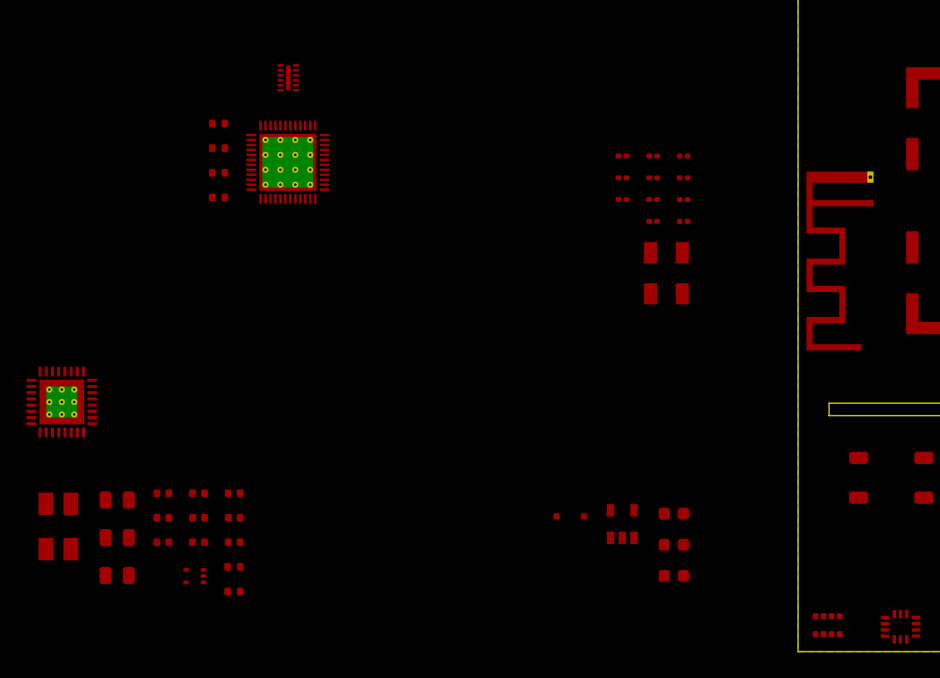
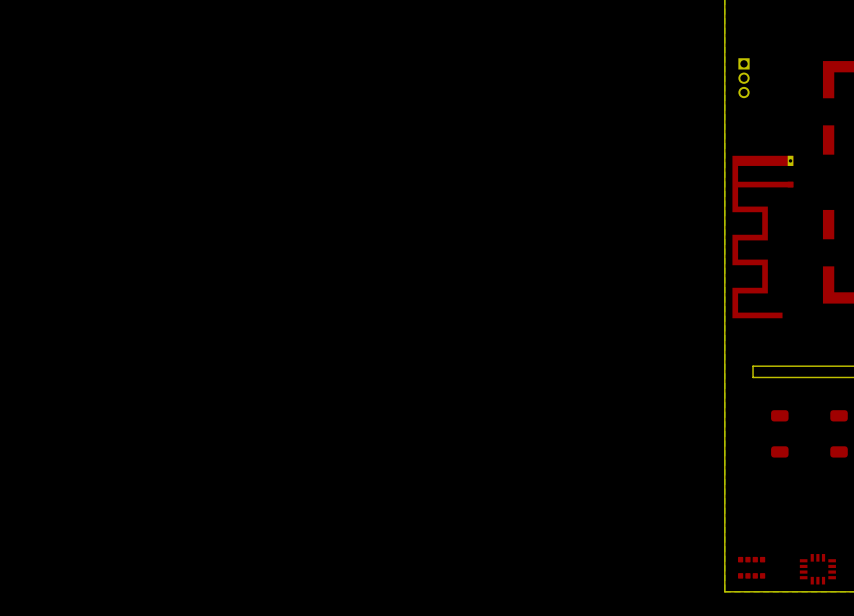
part: (288, 77) -> none
part: none -> (744, 78)
part: (218, 123) -> none
part: (218, 148) -> none
part: (622, 156) -> none
part: (653, 156) -> none
part: (683, 156) -> none
part: (287, 162) -> none
part: (218, 172) -> none
part: (622, 177) -> none
part: (653, 177) -> none
part: (683, 177) -> none
part: (218, 197) -> none
part: (622, 199) -> none
part: (653, 199) -> none
part: (683, 199) -> none
part: (653, 221) -> none
part: (683, 221) -> none
part: (666, 252) -> none
part: (666, 293) -> none
part: (61, 402) -> none
part: (162, 493) -> none
part: (198, 493) -> none
part: (234, 493) -> none
part: (117, 499) -> none
part: (58, 503) -> none
part: (673, 513) -> none
part: (570, 516) -> none
part: (162, 517) -> none
part: (198, 517) -> none
part: (234, 517) -> none
part: (622, 524) -> none
part: (117, 537) -> none
part: (162, 542) -> none
part: (198, 542) -> none
part: (234, 542) -> none
part: (673, 544) -> none
part: (58, 549) -> none
part: (233, 566) -> none
part: (117, 575) -> none
part: (673, 575) -> none
part: (194, 576) -> none
part: (233, 591) -> none

